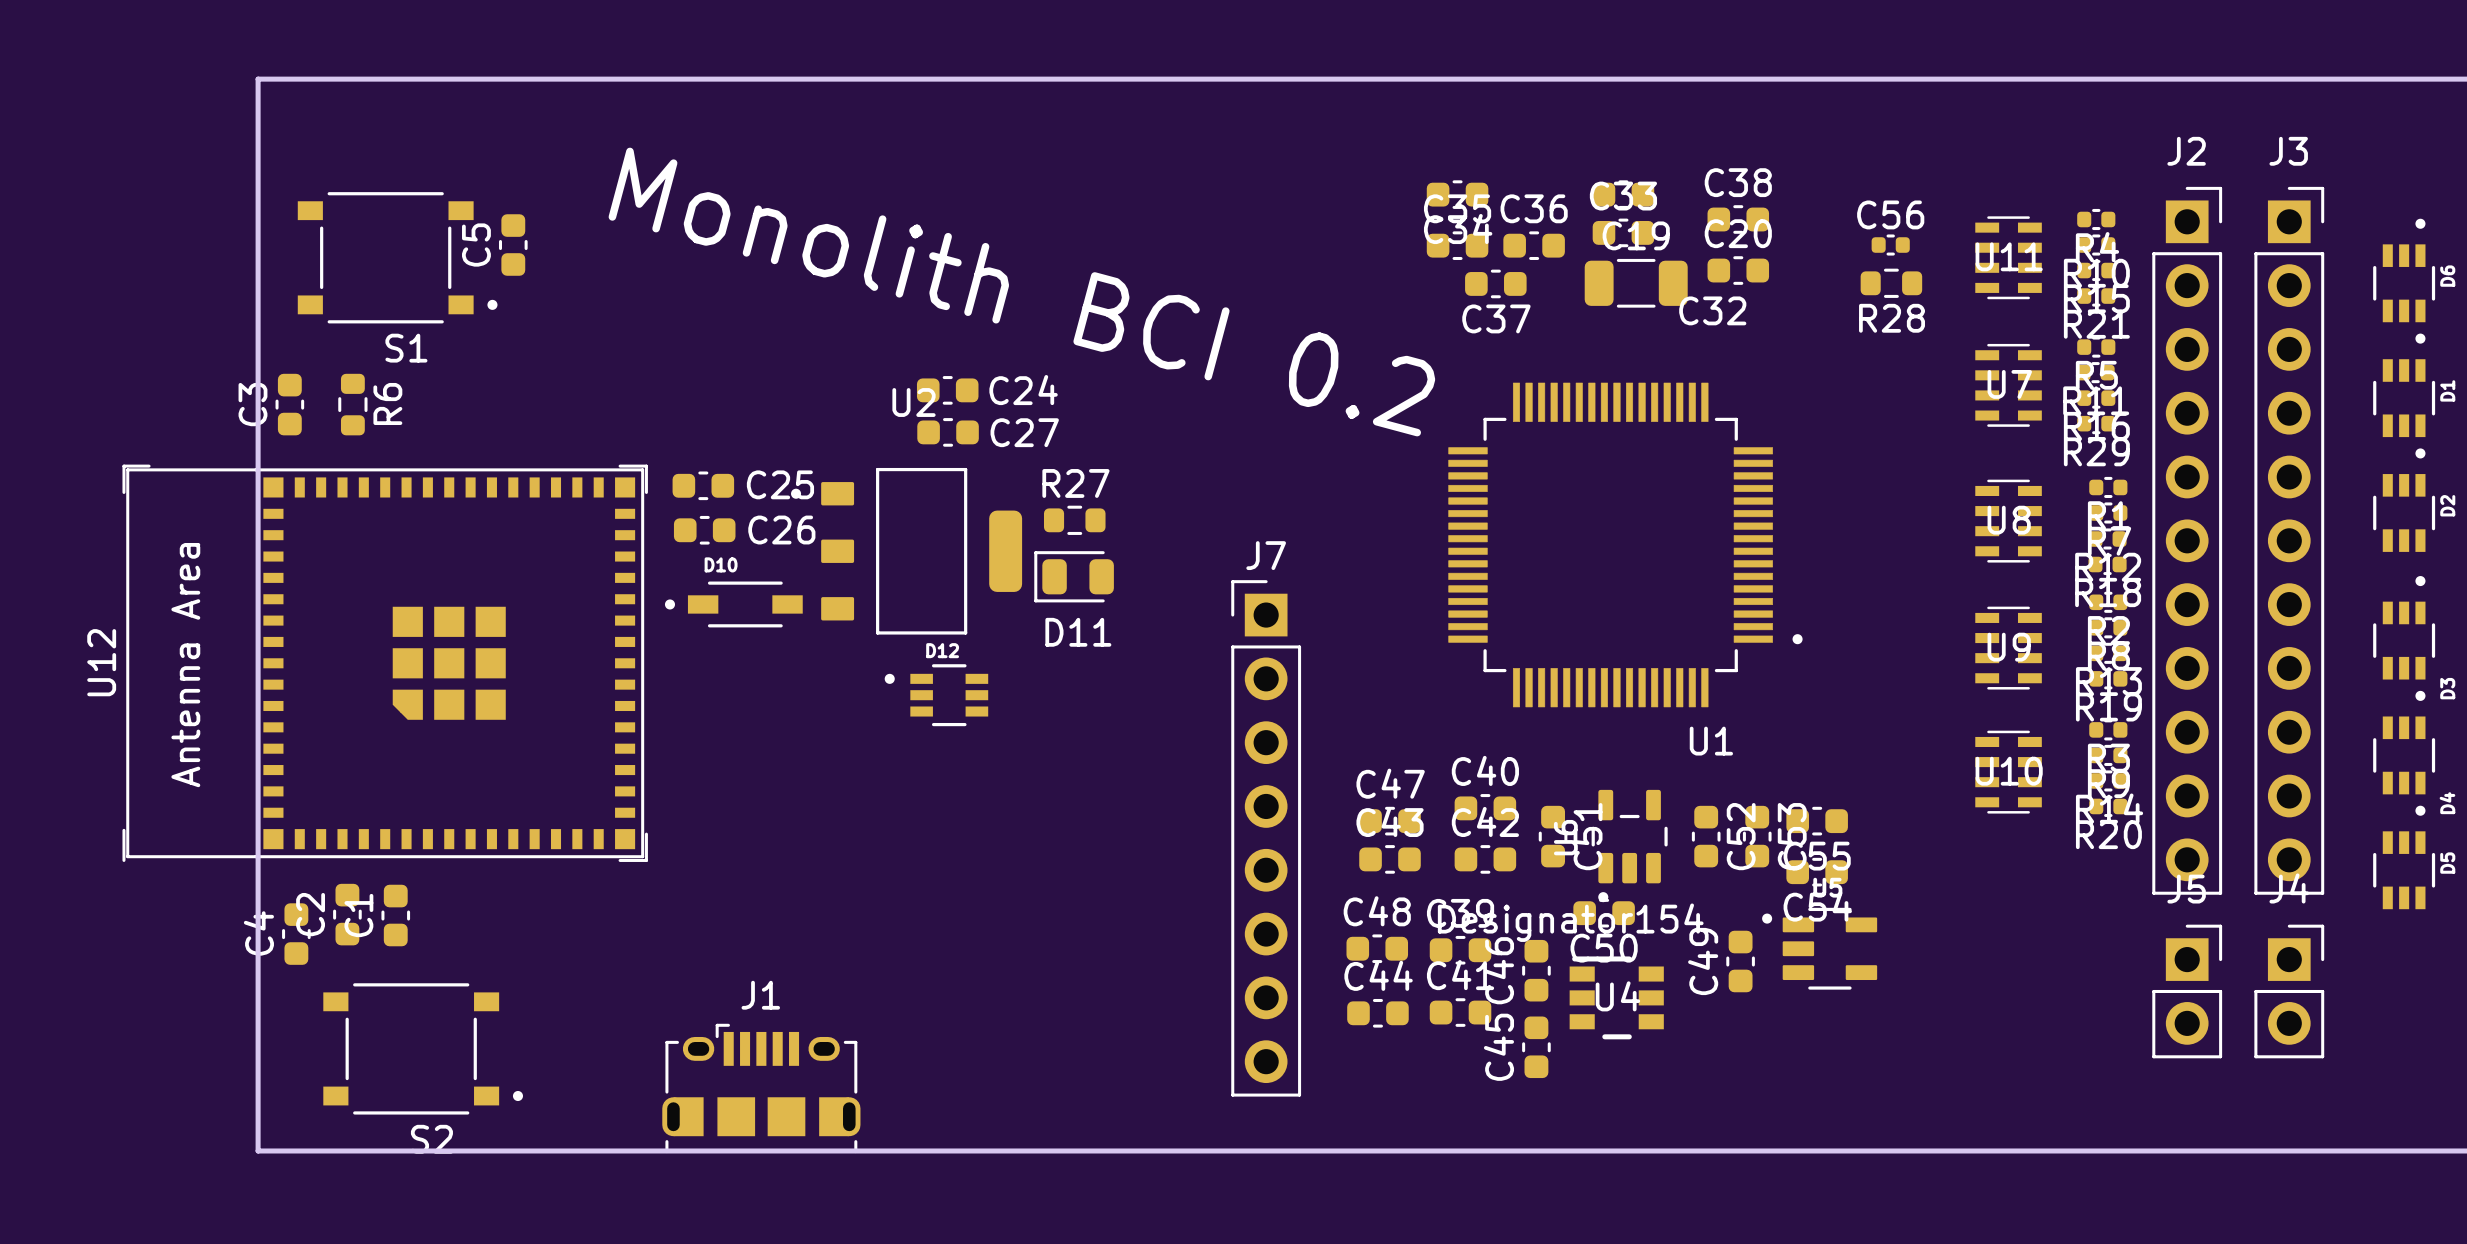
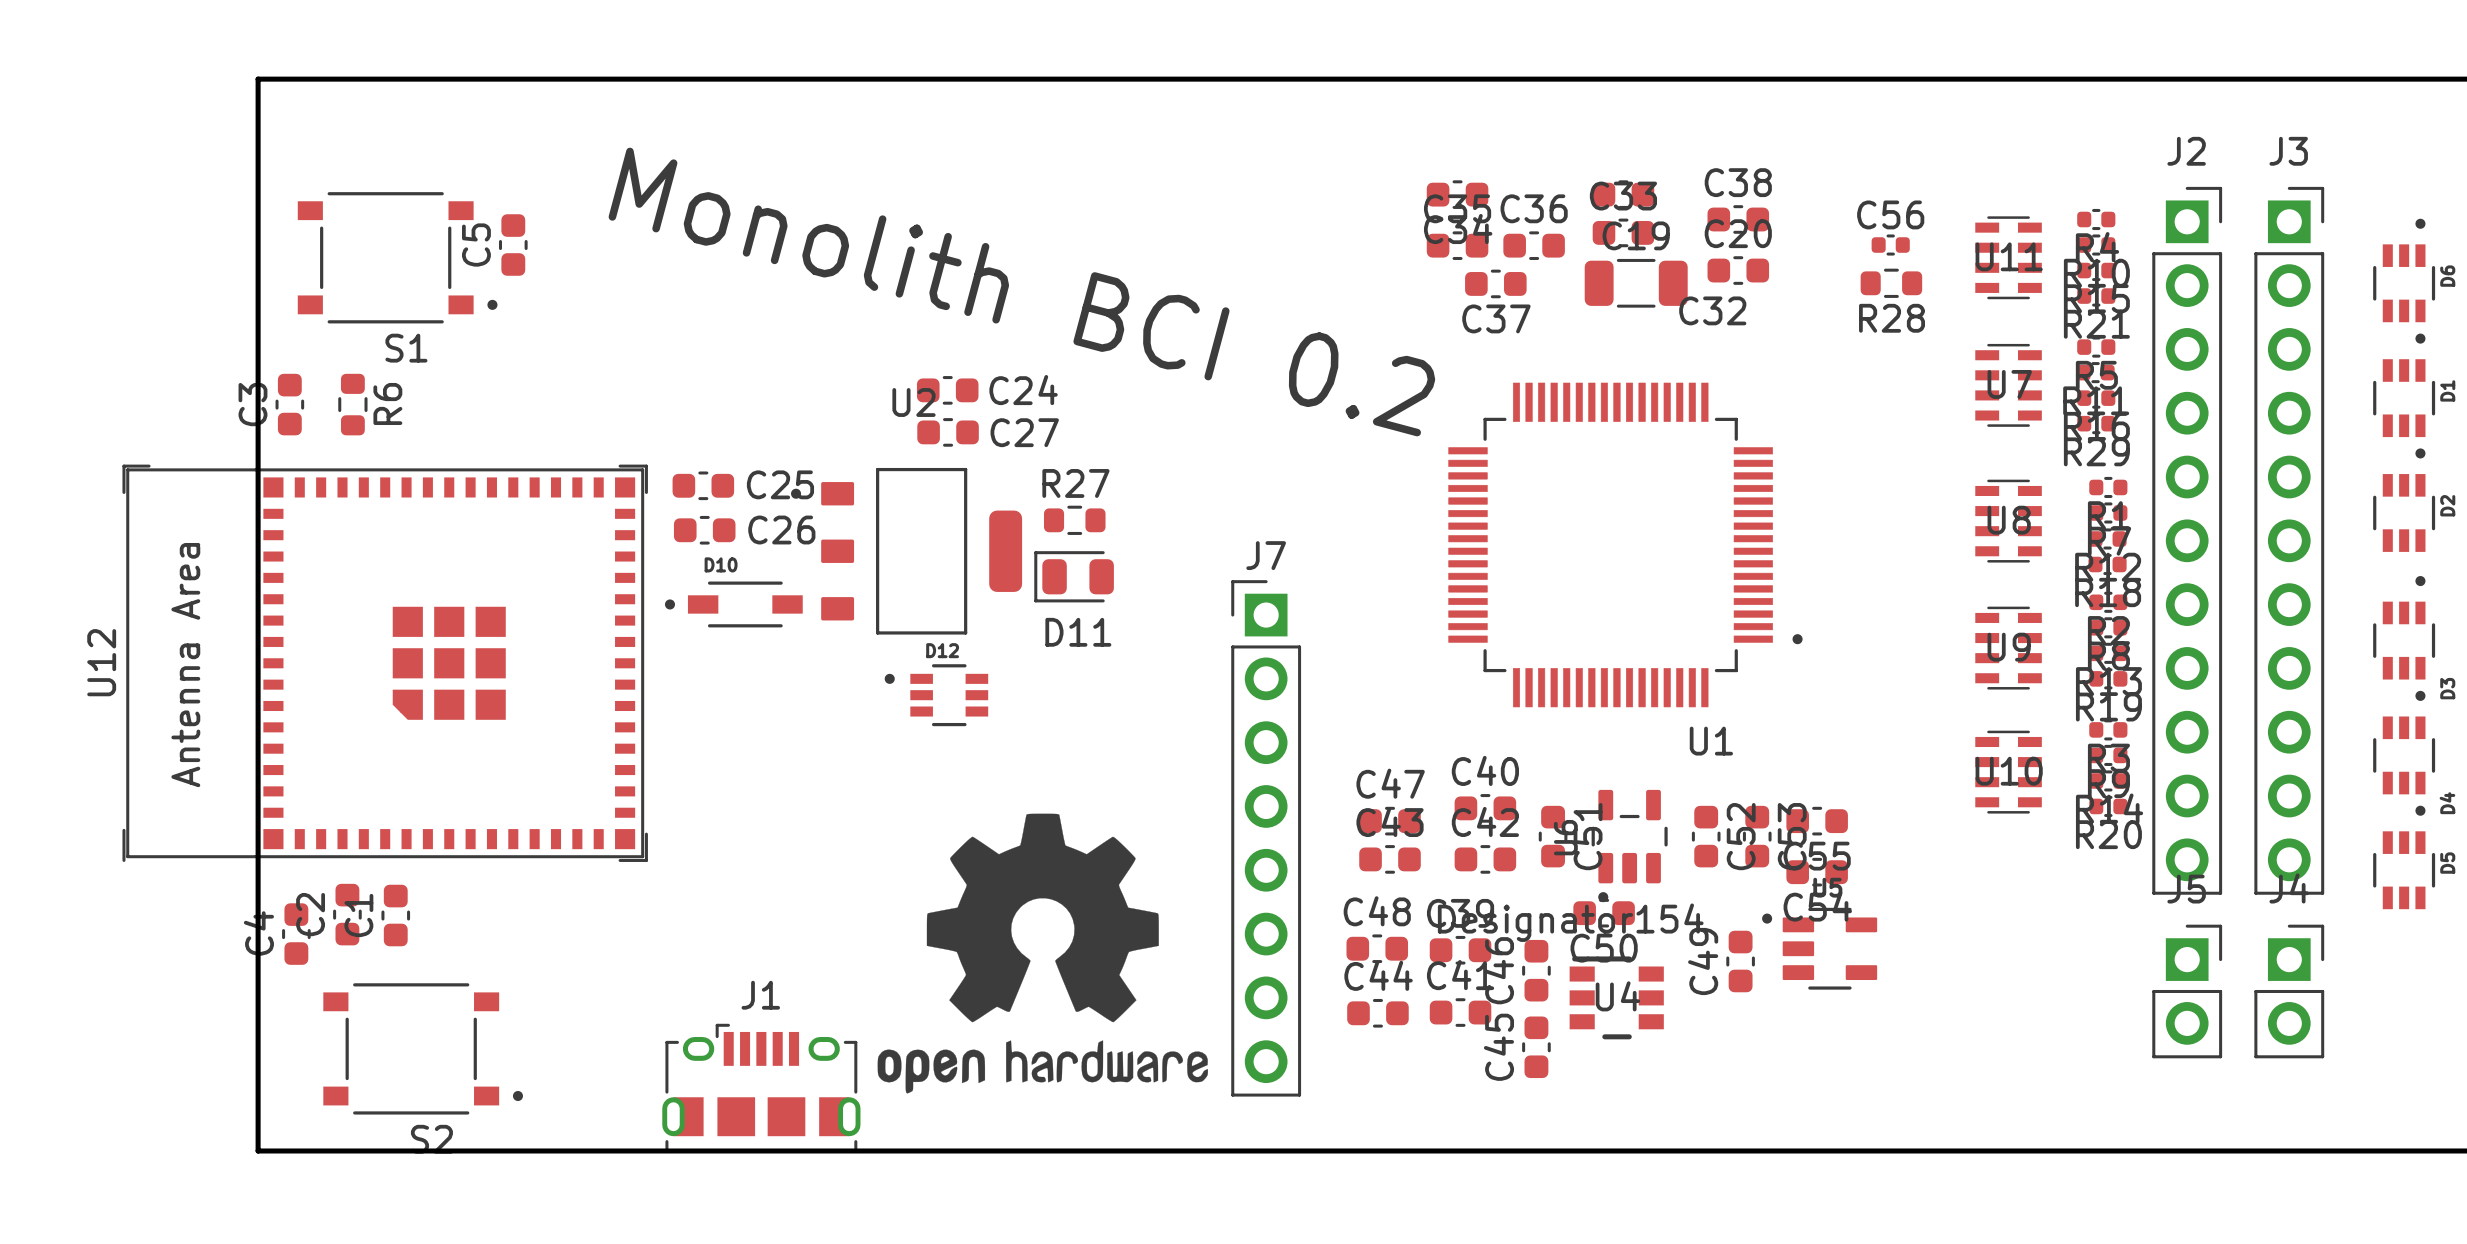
drawing: none -> [877, 813, 1208, 1094]

